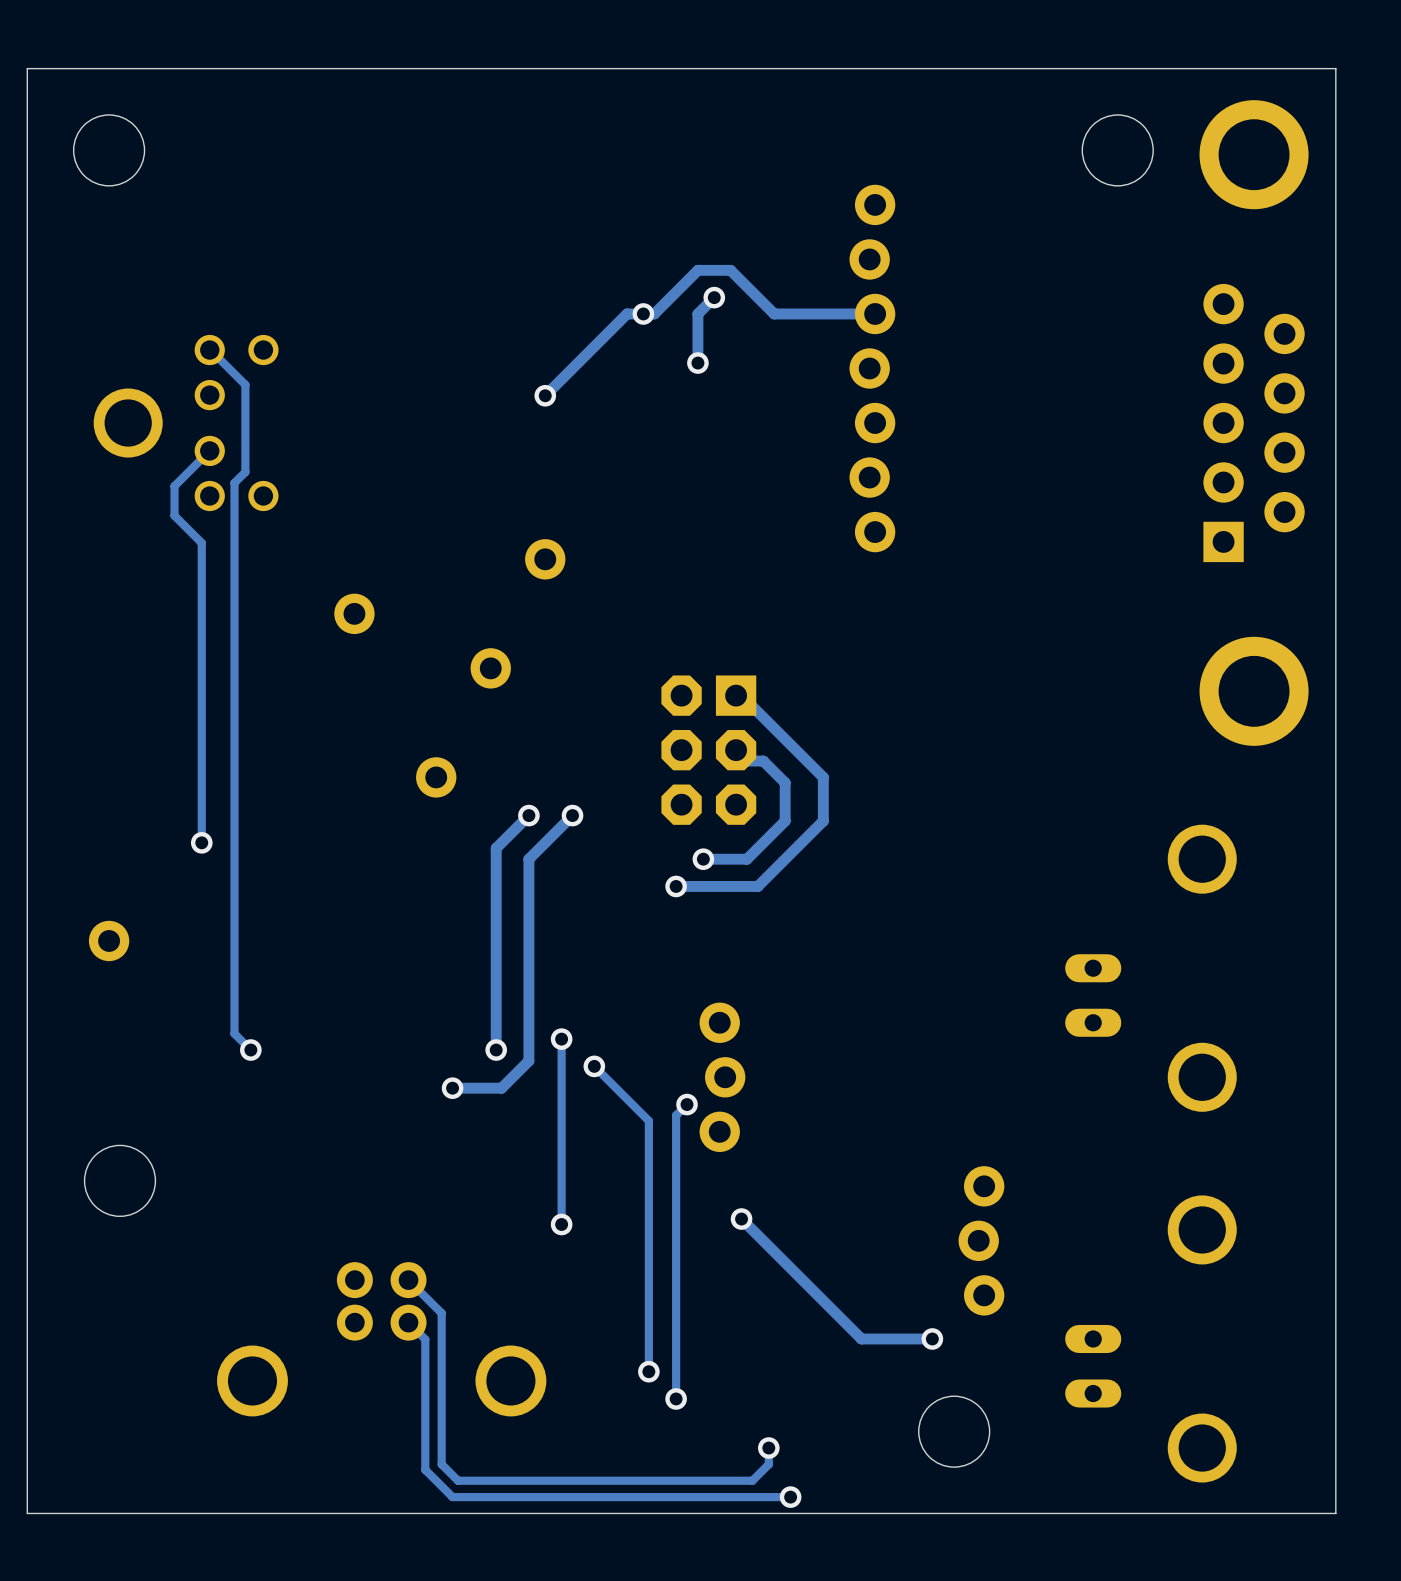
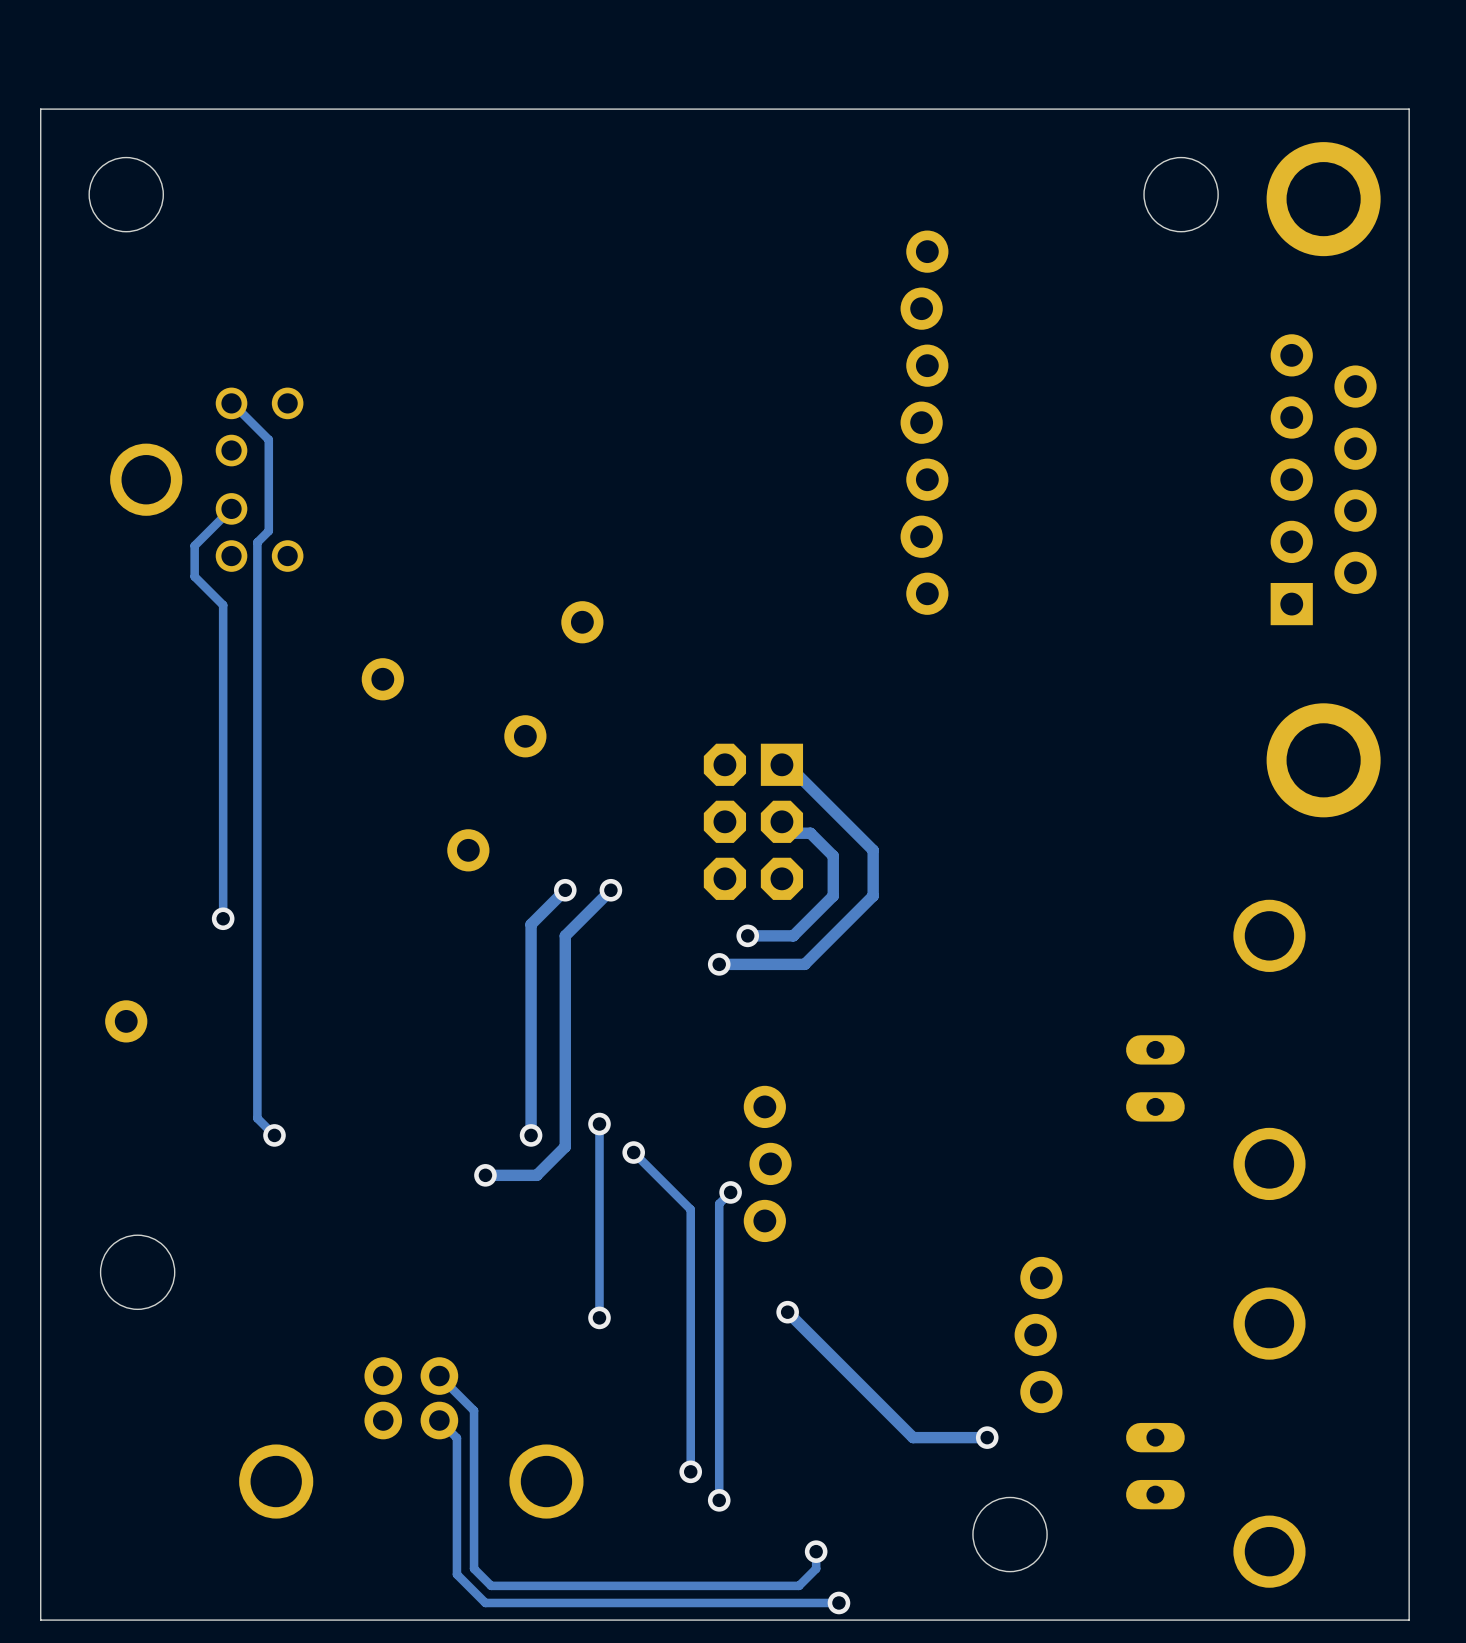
track: (714, 297) (697, 313) (697, 363) -> none
via: (714, 297) -> none
via: (643, 313) -> none
track: (875, 313) (774, 313) (730, 270) (697, 270) (654, 313) (627, 313) (545, 395) -> none
via: (697, 363) -> none
via: (545, 395) -> none

